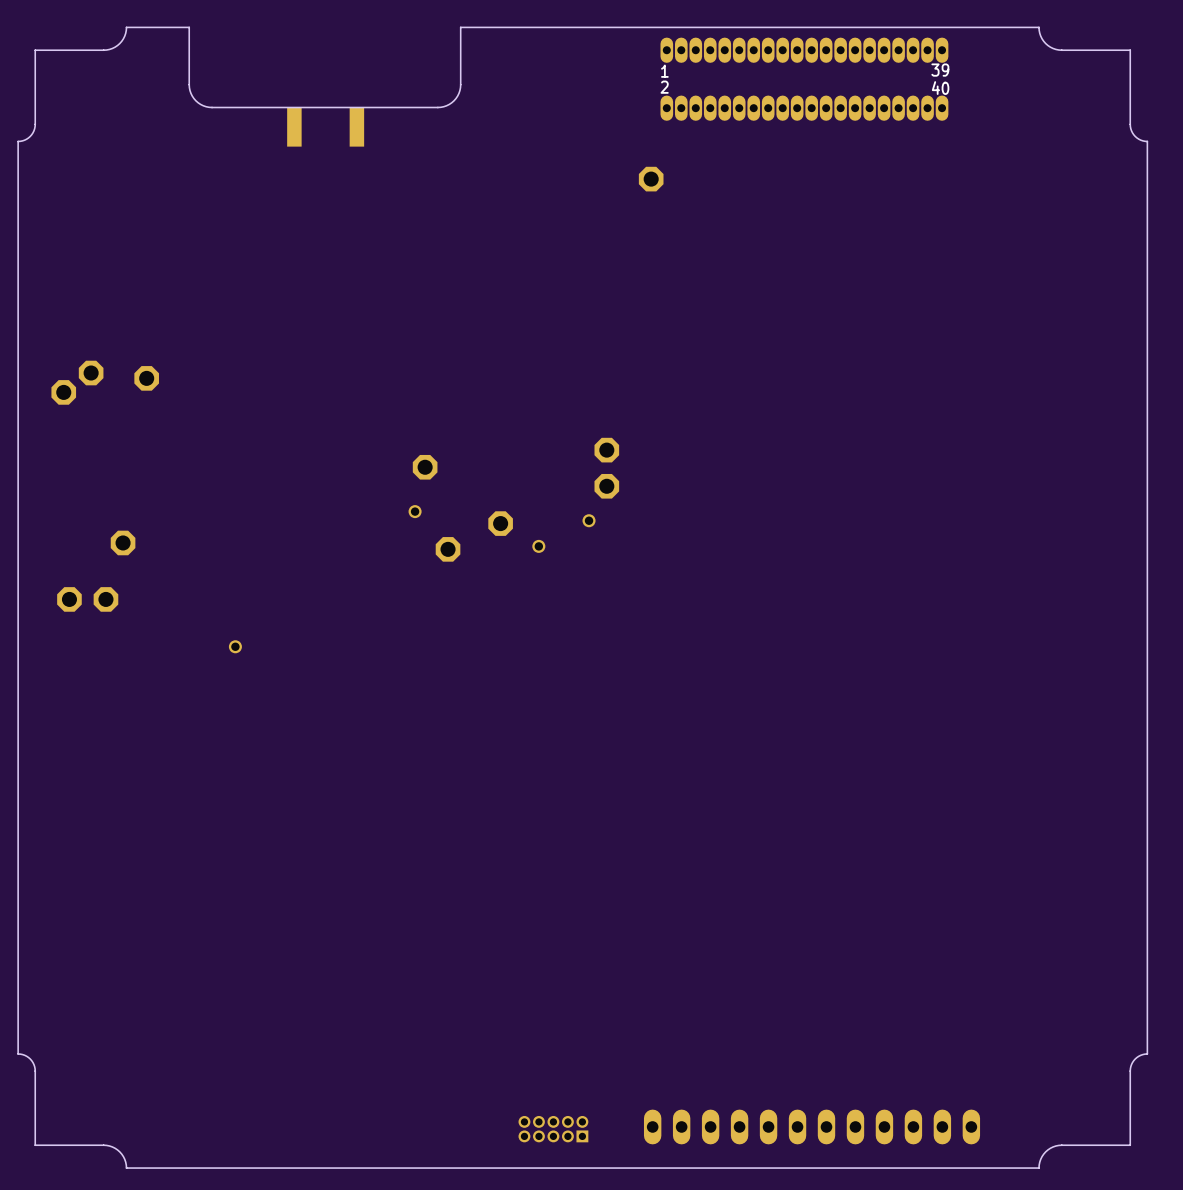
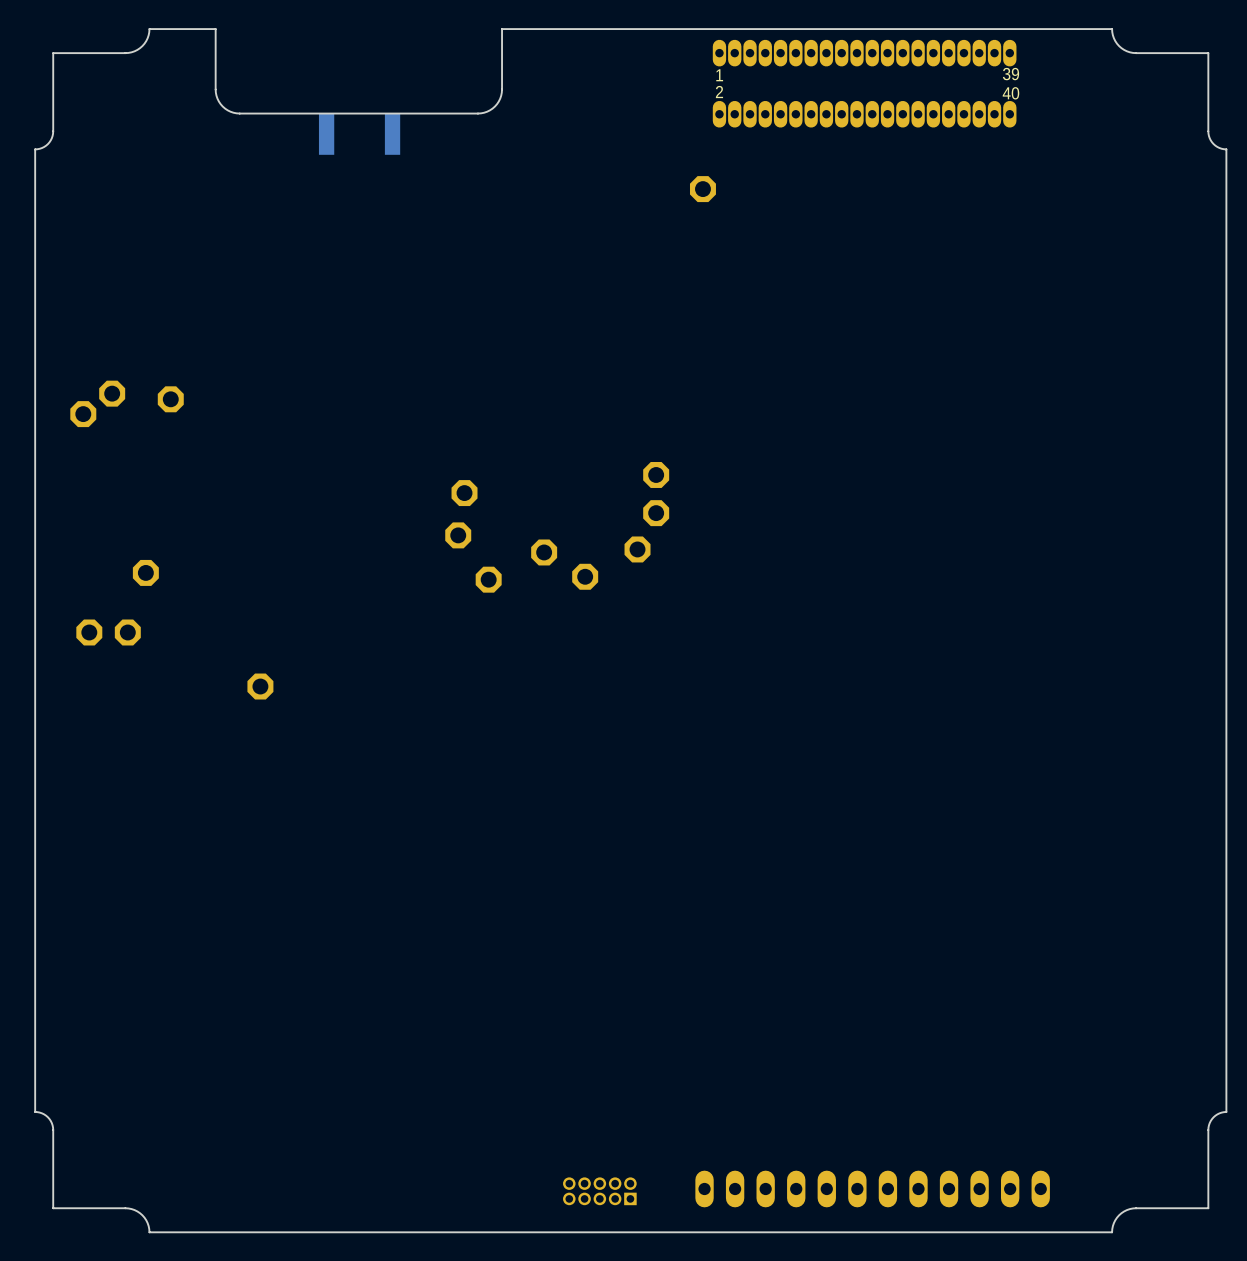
part footprint: [408, 505, 422, 519] -> [445, 522, 472, 549]
part footprint: [582, 514, 596, 528] -> [624, 536, 651, 563]
part footprint: [532, 539, 546, 553] -> [572, 563, 599, 590]
part footprint: [228, 640, 242, 654] -> [247, 673, 274, 700]

